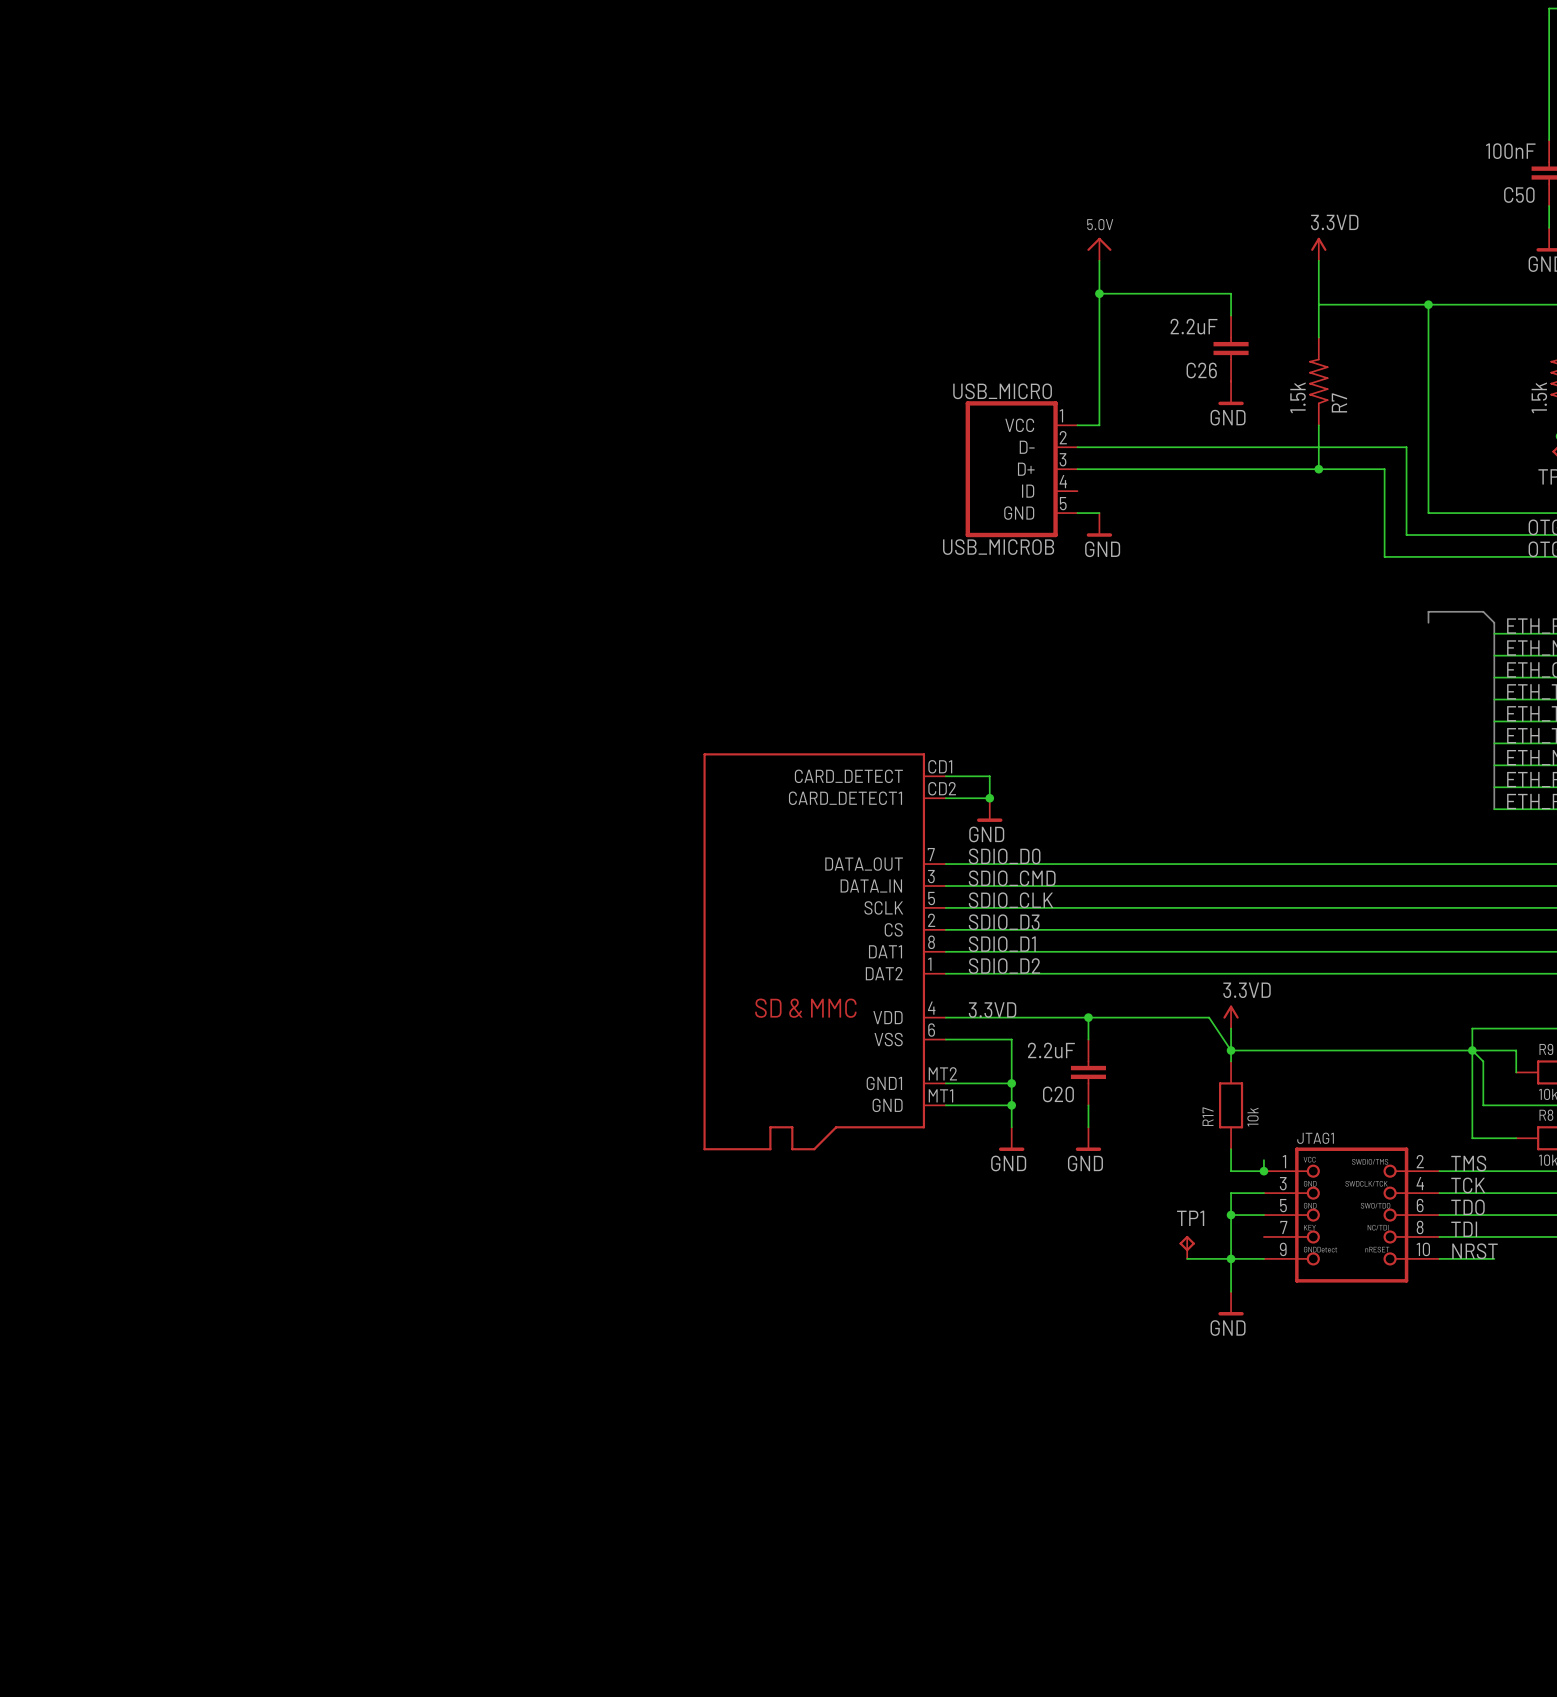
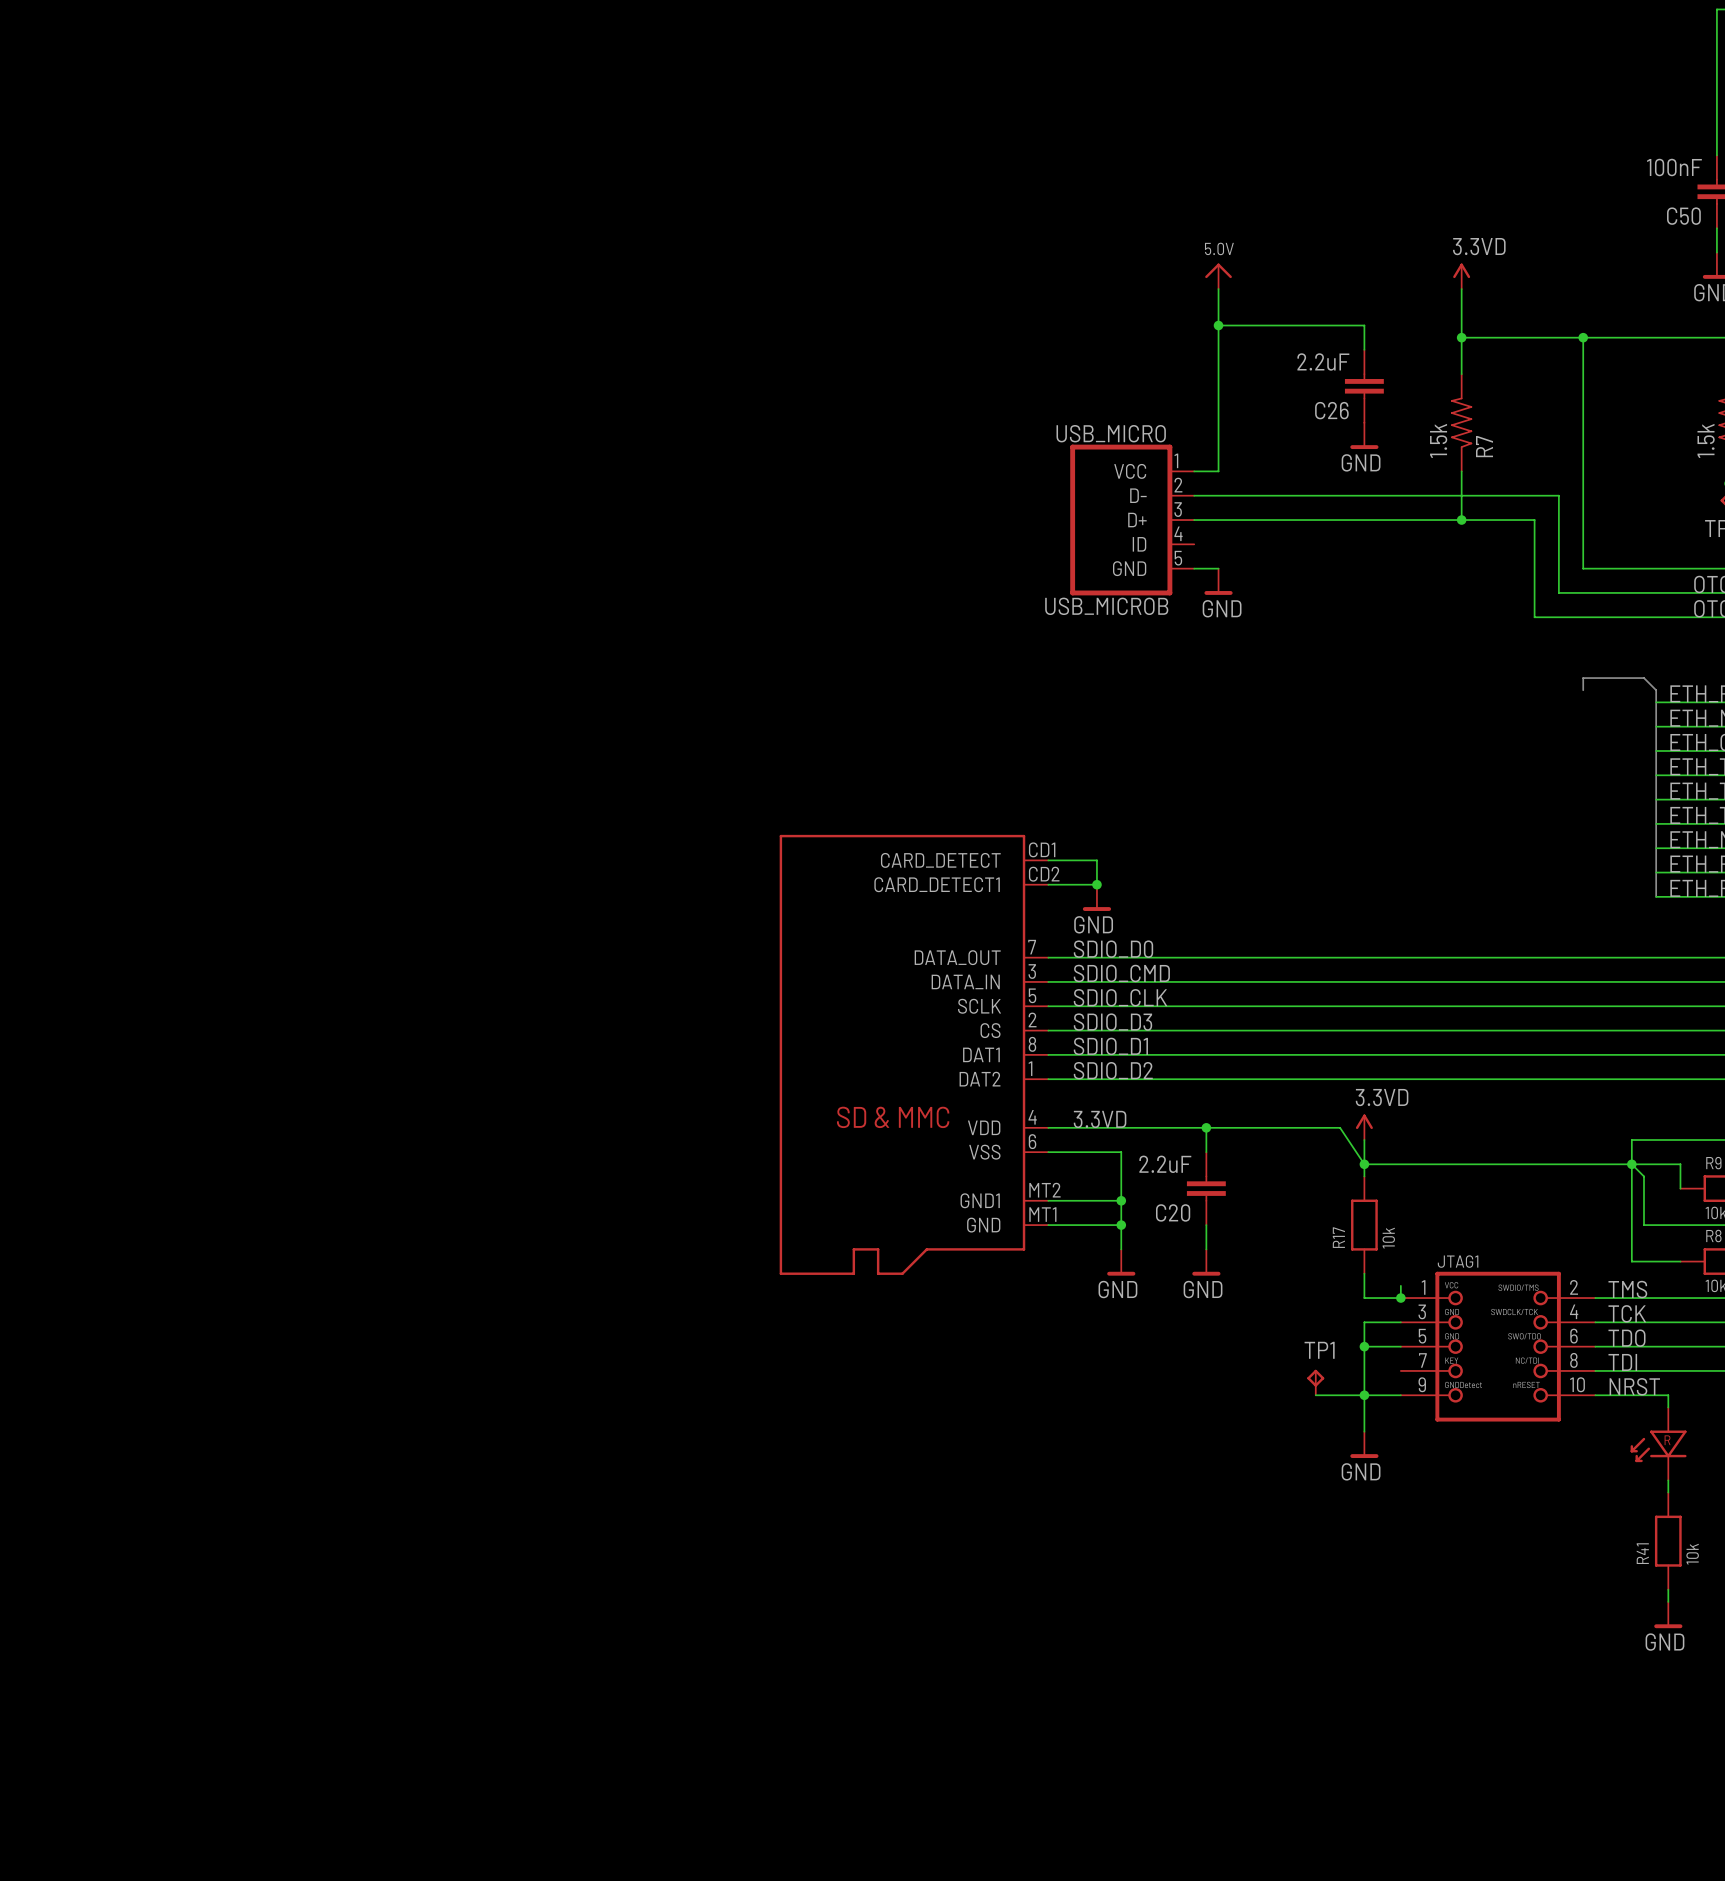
junction: none -> (1461, 337)
wire: none -> (1656, 1395) (1668, 1395) (1668, 1407)
part: none -> (1658, 1443)
wire: none -> (1668, 1480) (1668, 1492)
R41: none -> 10k (1668, 1541)
wire: none -> (1668, 1589) (1668, 1601)
power symbol: none -> GND (1668, 1615)

